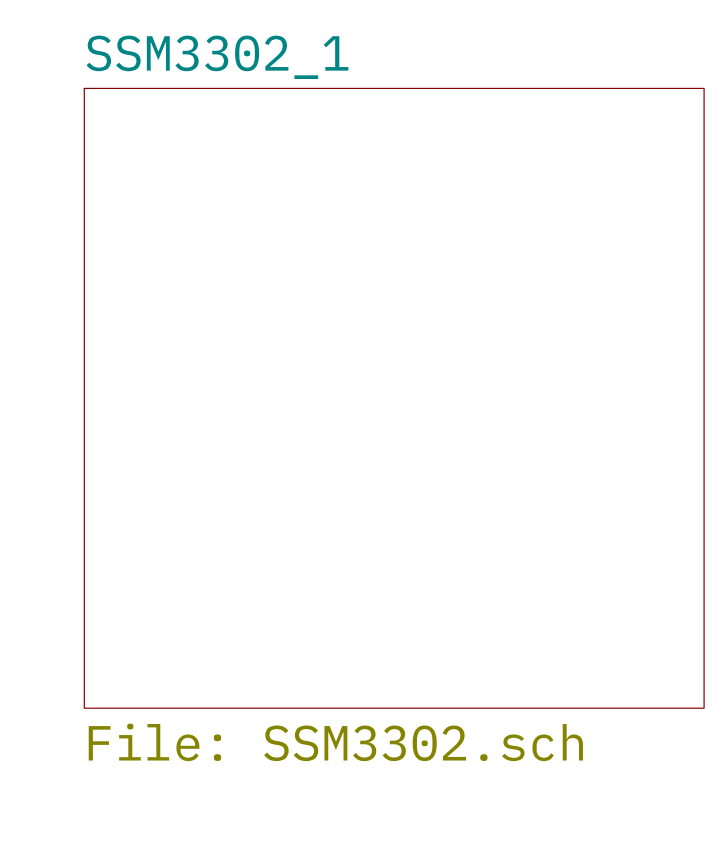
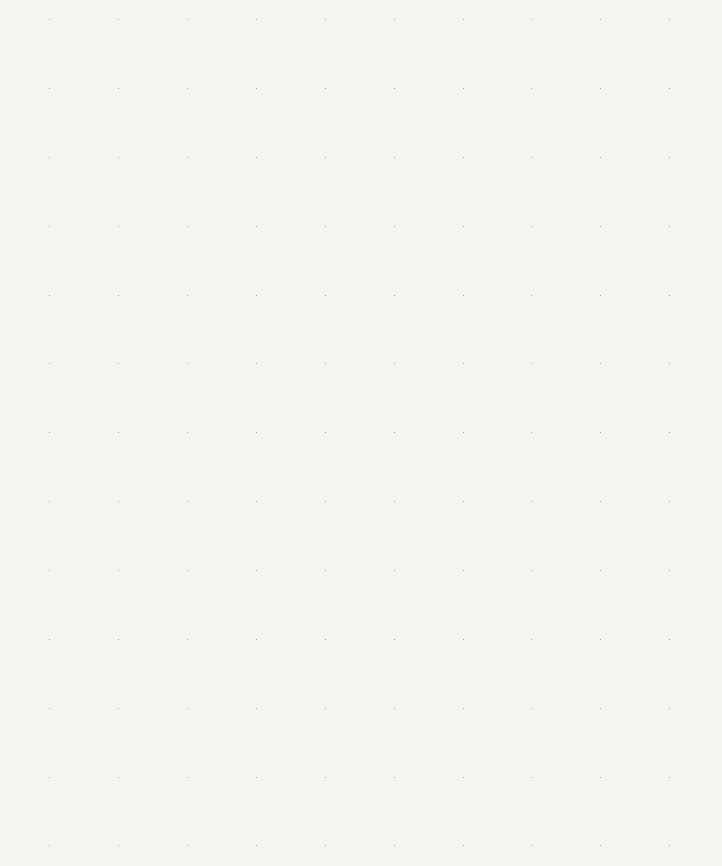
sheet SSM3302_1: File: SSM3302.sch (394, 398) -> none

